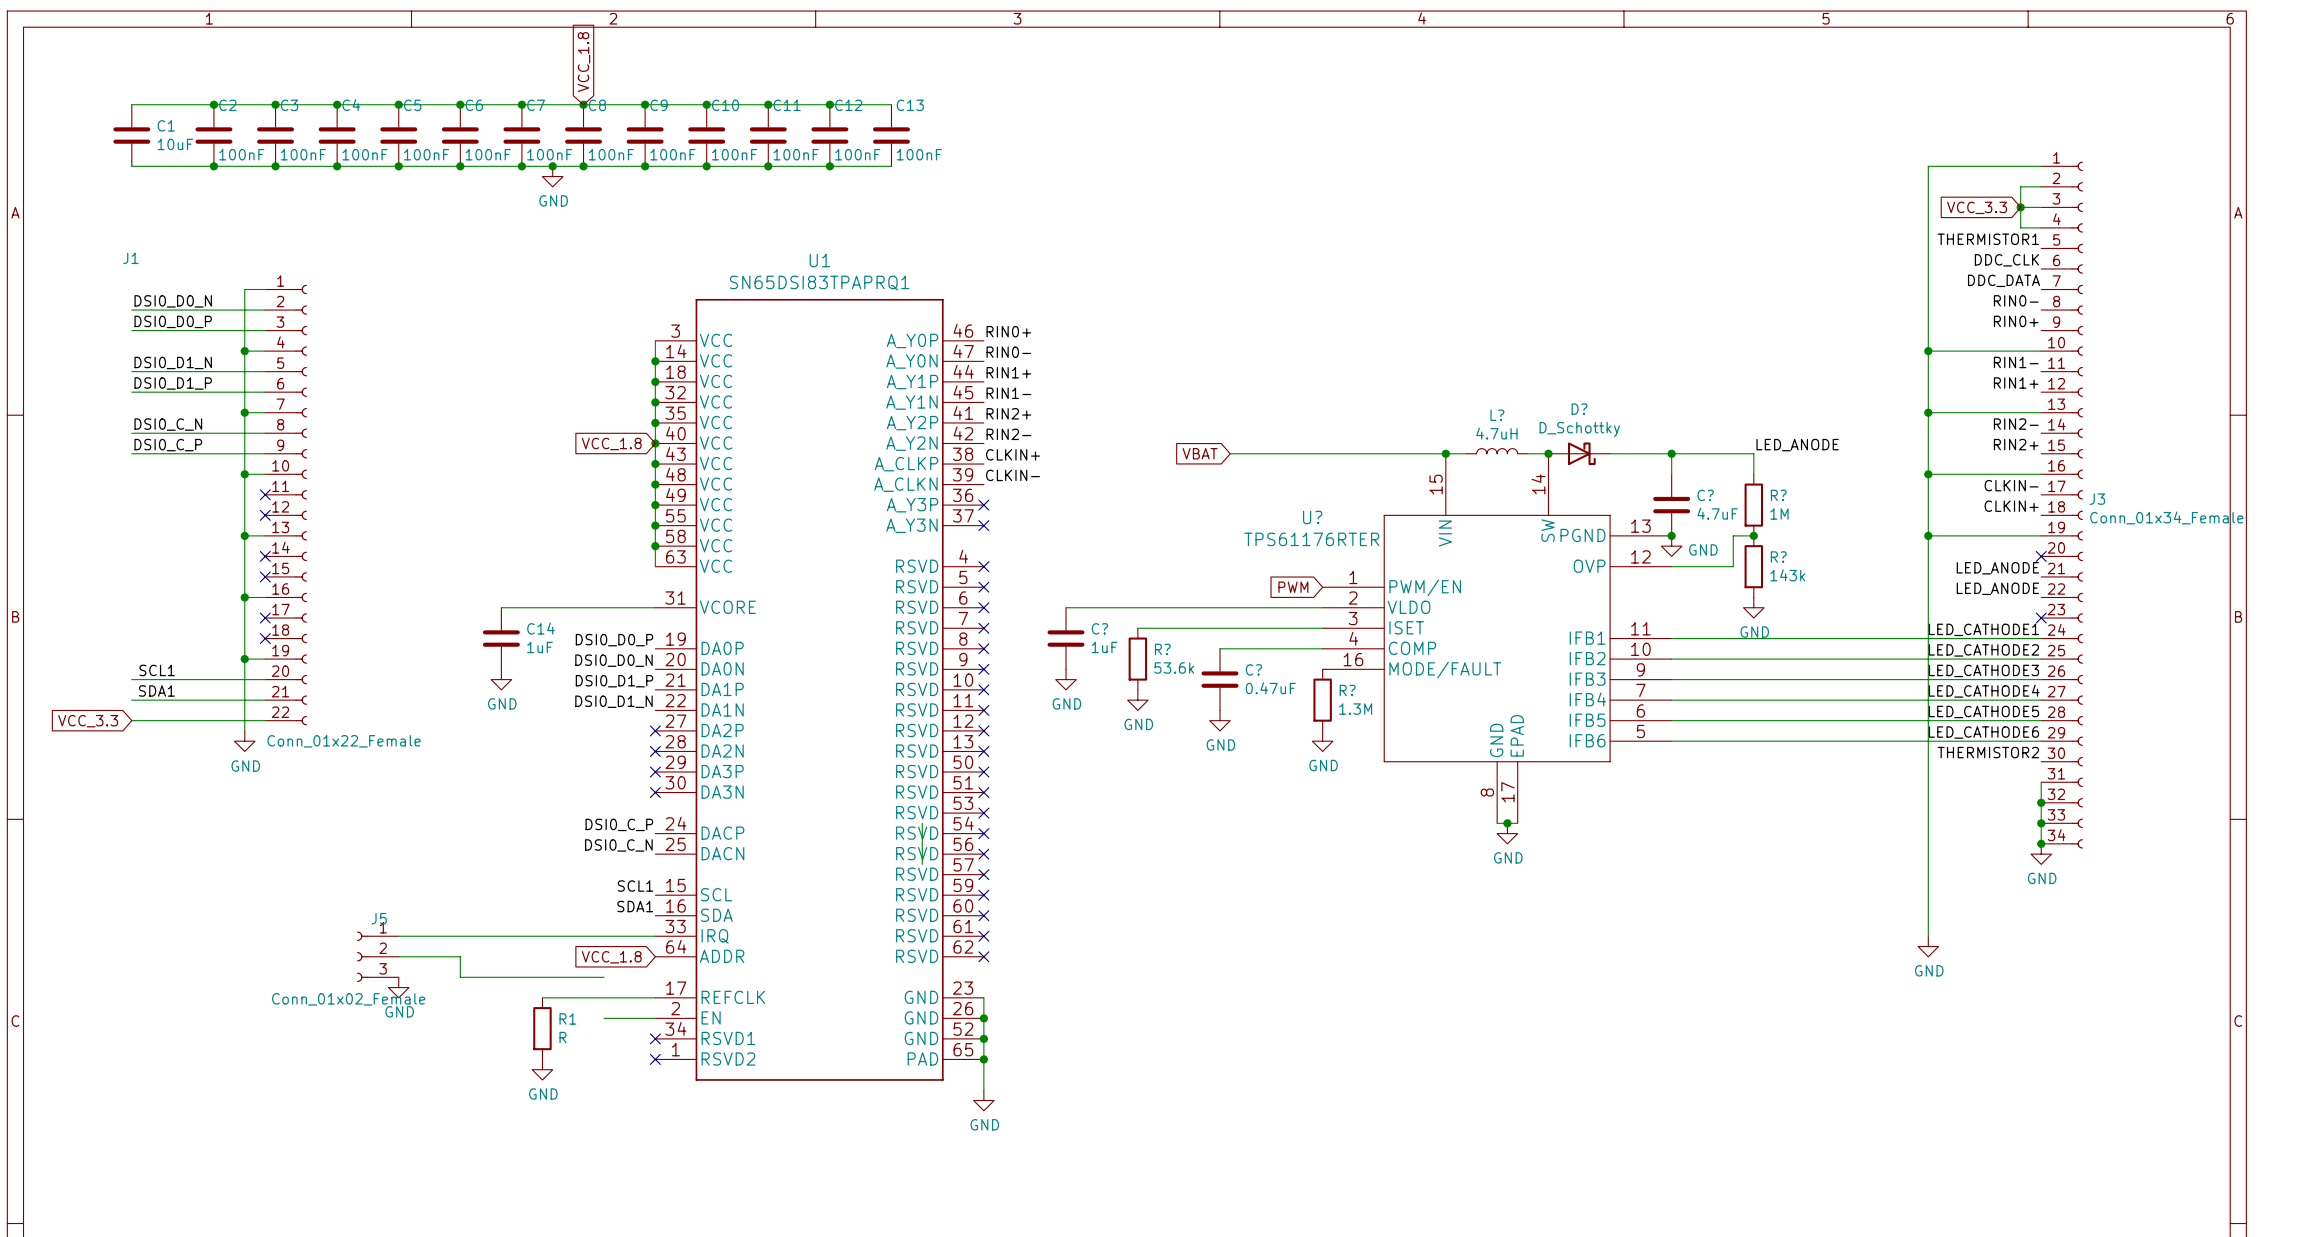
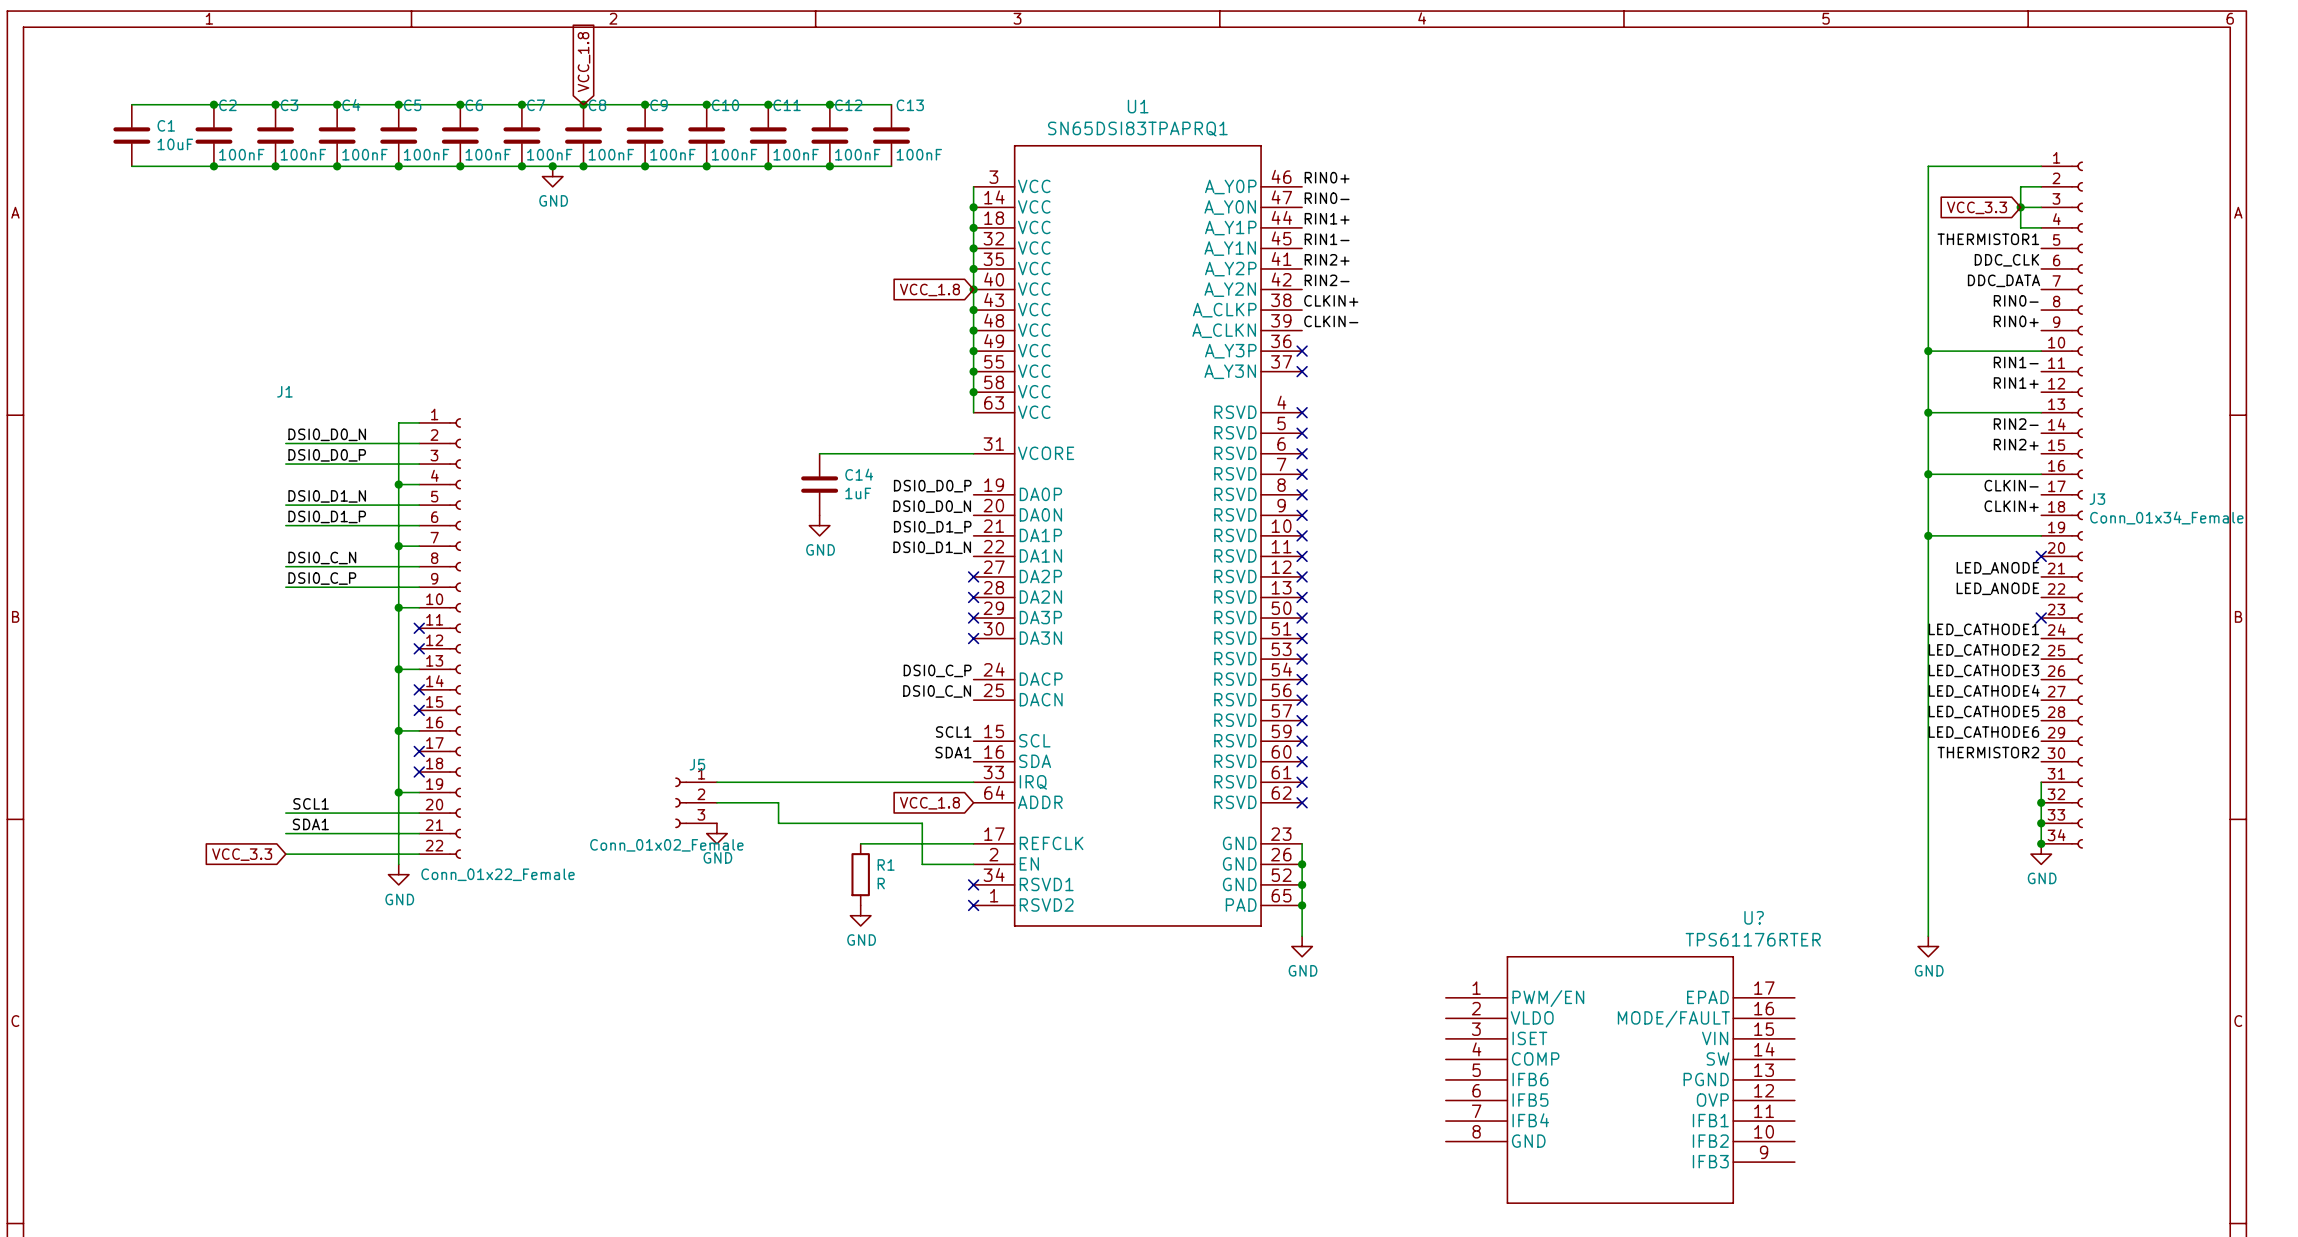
label: none -> RIN0+ (1327, 177)
wire: none -> (973, 186) (973, 412)
label: none -> RIN0- (1327, 198)
junction: none -> (973, 207)
label: none -> RIN1+ (1327, 218)
junction: none -> (973, 227)
label: none -> RIN1- (1327, 239)
junction: none -> (973, 248)
label: none -> RIN2+ (1327, 259)
junction: none -> (973, 268)
label: none -> RIN2- (1327, 280)
wire: (265, 289) (244, 289) (244, 730) -> none
junction: none -> (973, 289)
global label: none -> VCC_1.8 (929, 290)
label: none -> CLKIN+ (1331, 300)
label: DSI0_D0_N (173, 301) -> none
wire: (131, 310) (265, 310) -> none
junction: none -> (973, 310)
label: DSI0_D0_P (173, 321) -> none
label: none -> CLKIN- (1331, 321)
wire: (131, 330) (265, 330) -> none
junction: none -> (973, 330)
label: RIN0+ (1008, 331) -> none
wire: (655, 340) (655, 566) -> none
wire: (244, 351) (265, 351) -> none
junction: (244, 351) -> none
junction: none -> (973, 351)
no-connect mark: none -> (1302, 351)
label: RIN0- (1008, 352) -> none
junction: (655, 361) -> none
label: DSI0_D1_N (173, 362) -> none
wire: (131, 371) (265, 371) -> (285, 443) (419, 443)
junction: none -> (973, 371)
no-connect mark: none -> (1302, 371)
label: RIN1+ (1008, 372) -> none
junction: (655, 381) -> none
label: DSI0_D1_P (173, 383) -> none
wire: (131, 392) (265, 392) -> (285, 464) (419, 464)
junction: none -> (973, 392)
label: RIN1- (1008, 393) -> none
junction: (655, 402) -> none
wire: (244, 412) (265, 412) -> (398, 484) (419, 484)
junction: (244, 412) -> none
no-connect mark: none -> (1302, 412)
label: RIN2+ (1008, 413) -> none
wire: none -> (419, 422) (398, 422) (398, 864)
junction: (655, 422) -> none
label: DSI0_C_N (168, 424) -> none
wire: (131, 433) (265, 433) -> (285, 505) (419, 505)
no-connect mark: none -> (1302, 433)
label: none -> DSI0_D0_N (327, 434)
label: RIN2- (1008, 434) -> none
global label: VCC_1.8 (611, 443) -> none
junction: (655, 443) -> none
label: DSI0_C_P (168, 445) -> none
label: LED_ANODE (1797, 445) -> none
L?: 4.7uH (1497, 451) -> none
wire: (131, 453) (265, 453) -> (285, 525) (419, 525)
wire: none -> (819, 453) (973, 453)
global label: VBAT (1200, 453) -> none
wire: (1230, 453) (1466, 453) -> none
no-connect mark: none -> (1302, 453)
junction: (1445, 453) -> none
wire: (1527, 453) (1548, 453) -> none
junction: (1548, 453) -> none
D?: D_Schottky (1579, 453) -> none
wire: (1610, 453) (1753, 453) (1753, 474) -> none
wire: (1671, 453) (1671, 474) -> none
junction: (1671, 453) -> none
label: CLKIN+ (1013, 454) -> none
label: none -> DSI0_D0_P (327, 455)
junction: (655, 464) -> none
wire: (244, 474) (265, 474) -> (398, 546) (419, 546)
junction: (244, 474) -> none
no-connect mark: none -> (1302, 474)
label: CLKIN- (1013, 475) -> none
junction: none -> (398, 484)
junction: (655, 484) -> none
label: none -> DSI0_D0_P (932, 486)
no-connect mark: (265, 494) -> none
no-connect mark: none -> (1302, 494)
label: none -> DSI0_D1_N (327, 496)
J1 position: (286, 505) -> (440, 638)
junction: (655, 505) -> none
no-connect mark: (983, 505) -> none
C?: 4.7uF (1671, 505) -> none
R?: 1M (1753, 505) -> none
label: none -> DSI0_D0_N (932, 506)
no-connect mark: (265, 515) -> none
no-connect mark: none -> (1302, 515)
label: none -> DSI0_D1_P (327, 516)
junction: (655, 525) -> none
power symbol: none -> GND (819, 525)
no-connect mark: (983, 525) -> none
label: none -> DSI0_D1_P (932, 527)
wire: (244, 535) (265, 535) -> (398, 607) (419, 607)
junction: (244, 535) -> none
no-connect mark: none -> (1302, 535)
junction: (1671, 535) -> none
wire: (1753, 535) (1733, 535) (1733, 566) (1671, 566) -> none
junction: (1753, 535) -> none
junction: none -> (398, 546)
junction: (655, 546) -> none
power symbol: GND (1671, 546) -> none
label: none -> DSI0_D1_N (932, 547)
no-connect mark: (265, 556) -> none
no-connect mark: none -> (1302, 556)
label: none -> DSI0_C_N (322, 558)
no-connect mark: (983, 566) -> none
R?: 143k (1753, 566) -> none
no-connect mark: (265, 576) -> none
no-connect mark: none -> (973, 576)
no-connect mark: none -> (1302, 576)
label: none -> DSI0_C_P (322, 578)
wire: none -> (285, 587) (419, 587)
no-connect mark: (983, 587) -> none
global label: PWM (1293, 587) -> none
wire: (244, 597) (265, 597) -> (398, 669) (419, 669)
junction: (244, 597) -> none
no-connect mark: none -> (973, 597)
no-connect mark: none -> (1302, 597)
junction: none -> (398, 607)
wire: (501, 607) (655, 607) -> none
no-connect mark: (983, 607) -> none
wire: (1066, 607) (1322, 607) -> none
power symbol: GND (1753, 607) -> none
no-connect mark: (265, 618) -> none
no-connect mark: none -> (973, 618)
no-connect mark: none -> (1302, 618)
no-connect mark: none -> (419, 628)
no-connect mark: (983, 628) -> none
wire: (1137, 628) (1322, 628) -> none
no-connect mark: (265, 638) -> none
C14 position: (501, 638) -> (819, 484)
no-connect mark: none -> (973, 638)
C?: 1uF (1066, 638) -> none
no-connect mark: none -> (1302, 638)
U?: TPS61176RTER (1497, 638) -> none
wire: (1671, 638) (2041, 638) -> none
label: DSI0_D0_P (614, 640) -> none
no-connect mark: none -> (419, 648)
no-connect mark: (983, 648) -> none
wire: (1219, 648) (1322, 648) -> none
wire: (244, 659) (265, 659) -> (398, 730) (419, 730)
junction: (244, 659) -> none
R?: 53.6k (1137, 659) -> none
no-connect mark: none -> (1302, 659)
wire: (1671, 659) (2041, 659) -> none
label: DSI0_D0_N (613, 660) -> none
junction: none -> (398, 669)
no-connect mark: (983, 669) -> none
label: SCL1 (157, 670) -> none
label: none -> DSI0_C_P (937, 670)
wire: (131, 679) (265, 679) -> (285, 566) (419, 566)
power symbol: GND (501, 679) -> none
power symbol: GND (1066, 679) -> none
C?: 0.47uF (1219, 679) -> none
no-connect mark: none -> (1302, 679)
wire: (1671, 679) (2041, 679) -> none
label: DSI0_D1_P (614, 681) -> none
no-connect mark: none -> (419, 689)
U1 position: (819, 689) -> (1137, 535)
no-connect mark: (983, 689) -> none
label: SDA1 (156, 690) -> none
label: none -> DSI0_C_N (937, 691)
wire: (131, 700) (265, 700) -> (285, 813) (419, 813)
power symbol: GND (1137, 700) -> none
no-connect mark: none -> (1302, 700)
R?: 1.3M (1322, 700) -> none
wire: (1671, 700) (2041, 700) -> none
label: DSI0_D1_N (613, 701) -> none
no-connect mark: none -> (419, 710)
no-connect mark: (983, 710) -> none
wire: (131, 720) (265, 720) -> (285, 833) (419, 833)
power symbol: GND (1219, 720) -> none
no-connect mark: none -> (1302, 720)
wire: (1671, 720) (2041, 720) -> none
global label: VCC_3.3 (88, 721) -> none
junction: none -> (398, 730)
no-connect mark: (655, 730) -> none
no-connect mark: (983, 730) -> none
label: none -> SCL1 (953, 732)
power symbol: GND (244, 741) -> none
no-connect mark: none -> (1302, 741)
power symbol: GND (1322, 741) -> none
wire: (1671, 741) (2041, 741) -> none
no-connect mark: none -> (419, 751)
no-connect mark: (655, 751) -> none
no-connect mark: (983, 751) -> none
label: none -> SDA1 (953, 752)
no-connect mark: none -> (1302, 761)
no-connect mark: none -> (419, 772)
no-connect mark: (655, 772) -> none
no-connect mark: (983, 772) -> none
wire: none -> (716, 782) (973, 782)
no-connect mark: none -> (1302, 782)
wire: none -> (398, 792) (419, 792)
junction: none -> (398, 792)
no-connect mark: (655, 792) -> none
no-connect mark: (983, 792) -> none
wire: none -> (716, 802) (778, 802) (778, 823) (922, 823)
no-connect mark: none -> (1302, 802)
label: none -> SCL1 (311, 803)
global label: none -> VCC_1.8 (929, 803)
no-connect mark: (983, 813) -> none
wire: (1497, 823) (1517, 823) -> none
junction: (1507, 823) -> none
label: none -> SDA1 (310, 824)
label: DSI0_C_P (619, 824) -> none
power symbol: none -> GND (716, 833)
no-connect mark: (983, 833) -> none
power symbol: GND (1507, 833) -> none
wire: none -> (860, 843) (973, 843)
wire: none -> (1302, 843) (1302, 936)
label: DSI0_C_N (618, 845) -> none
global label: none -> VCC_3.3 (242, 854)
wire: none -> (285, 854) (419, 854)
no-connect mark: (983, 854) -> none
wire: none -> (922, 864) (973, 864)
junction: none -> (1302, 864)
power symbol: none -> GND (398, 874)
no-connect mark: (983, 874) -> none
no-connect mark: none -> (973, 884)
junction: none -> (1302, 884)
label: SCL1 (635, 886) -> none
no-connect mark: (983, 895) -> none
no-connect mark: none -> (973, 905)
junction: none -> (1302, 905)
label: SDA1 (635, 906) -> none
power symbol: none -> GND (860, 915)
no-connect mark: (983, 915) -> none
wire: (398, 936) (655, 936) -> none
no-connect mark: (983, 936) -> none
power symbol: none -> GND (1302, 946)
J5 position: (377, 956) -> (696, 802)
wire: (398, 956) (460, 956) (460, 977) (604, 977) -> none
no-connect mark: (983, 956) -> none
global label: VCC_1.8 (611, 957) -> none
power symbol: GND (398, 987) -> none
wire: (542, 997) (655, 997) -> none
wire: (983, 997) (983, 1090) -> none
wire: (604, 1018) (655, 1018) -> none
junction: (983, 1018) -> none
R1 position: (542, 1028) -> (860, 874)
no-connect mark: (655, 1038) -> none
junction: (983, 1038) -> none
no-connect mark: (655, 1059) -> none
junction: (983, 1059) -> none
power symbol: GND (542, 1069) -> none
U?: none -> TPS61176RTER (1620, 1079)
power symbol: GND (983, 1100) -> none

